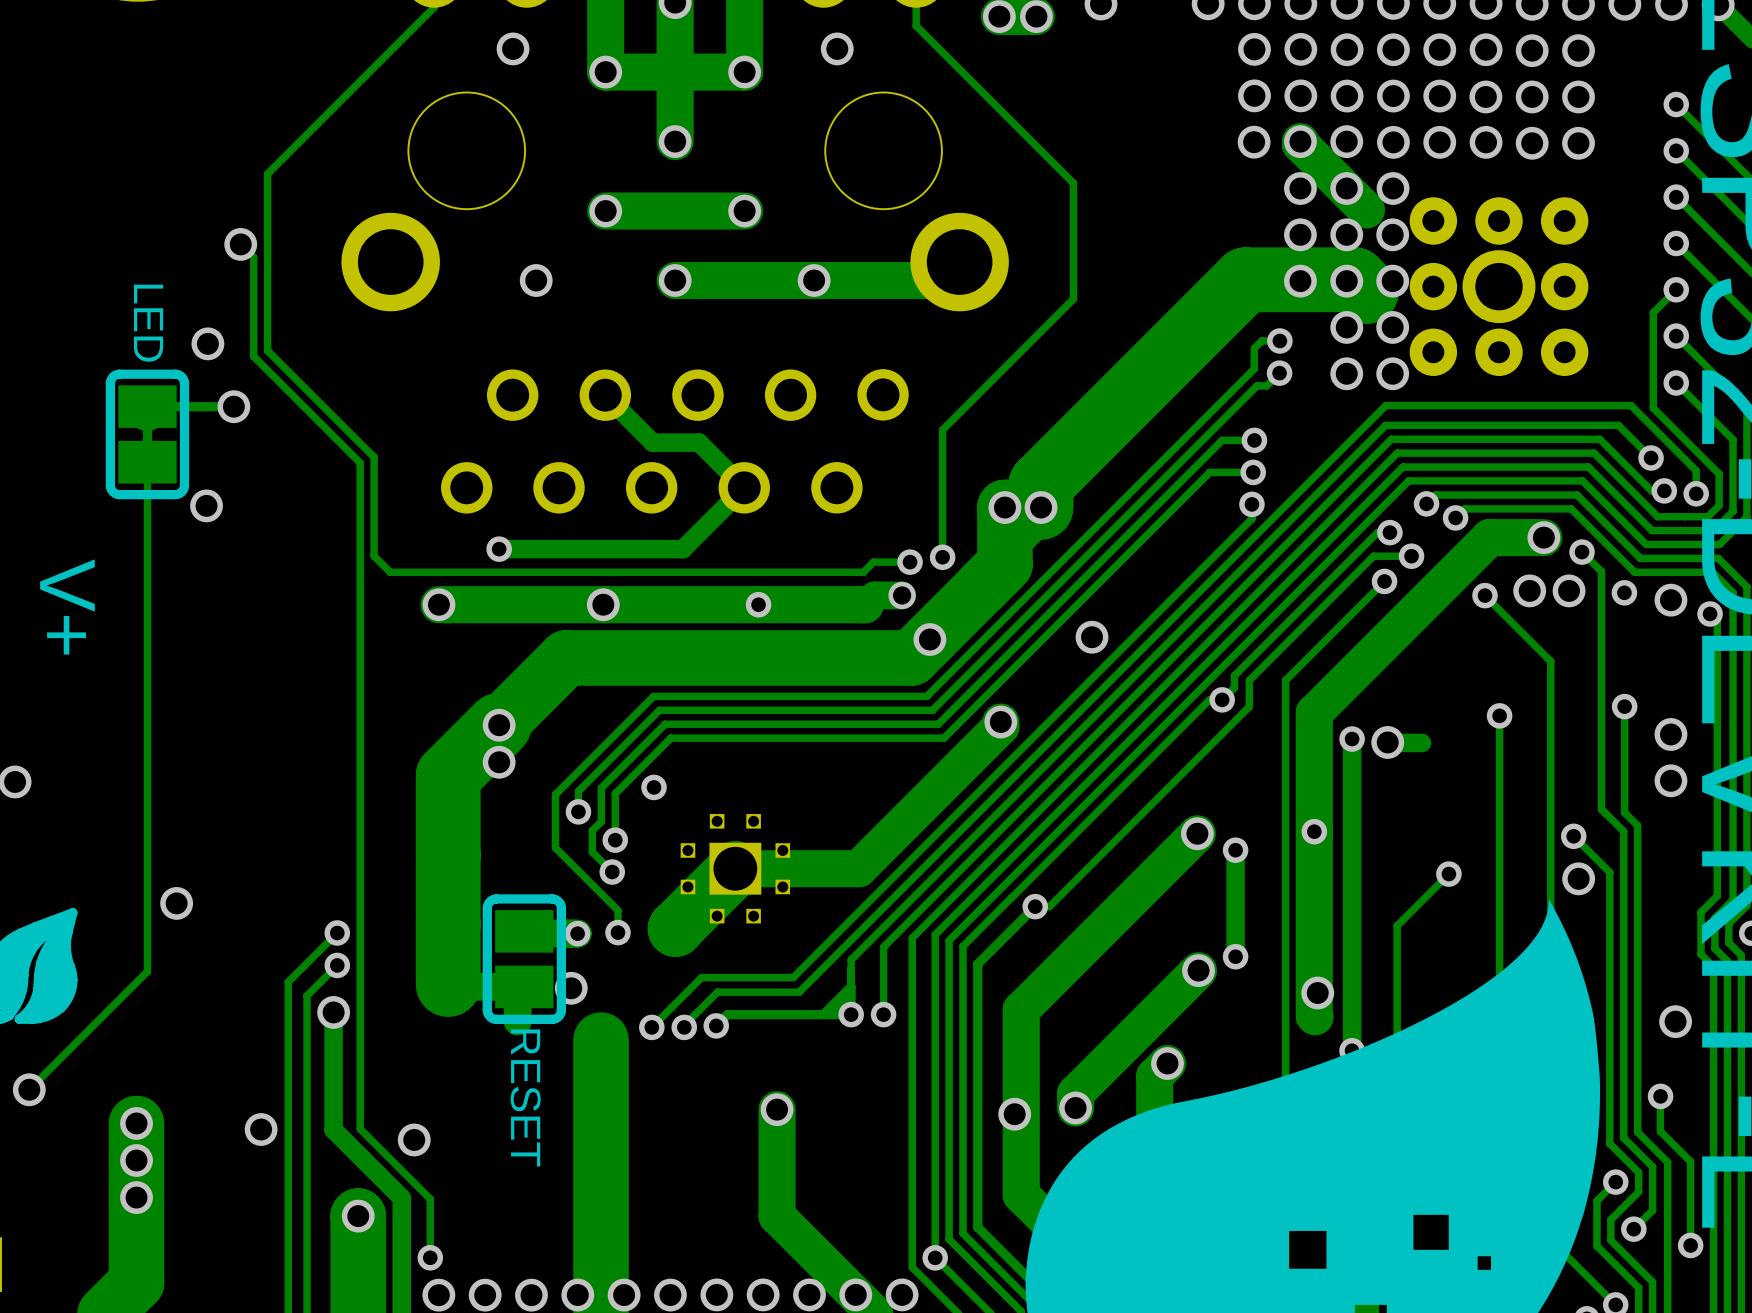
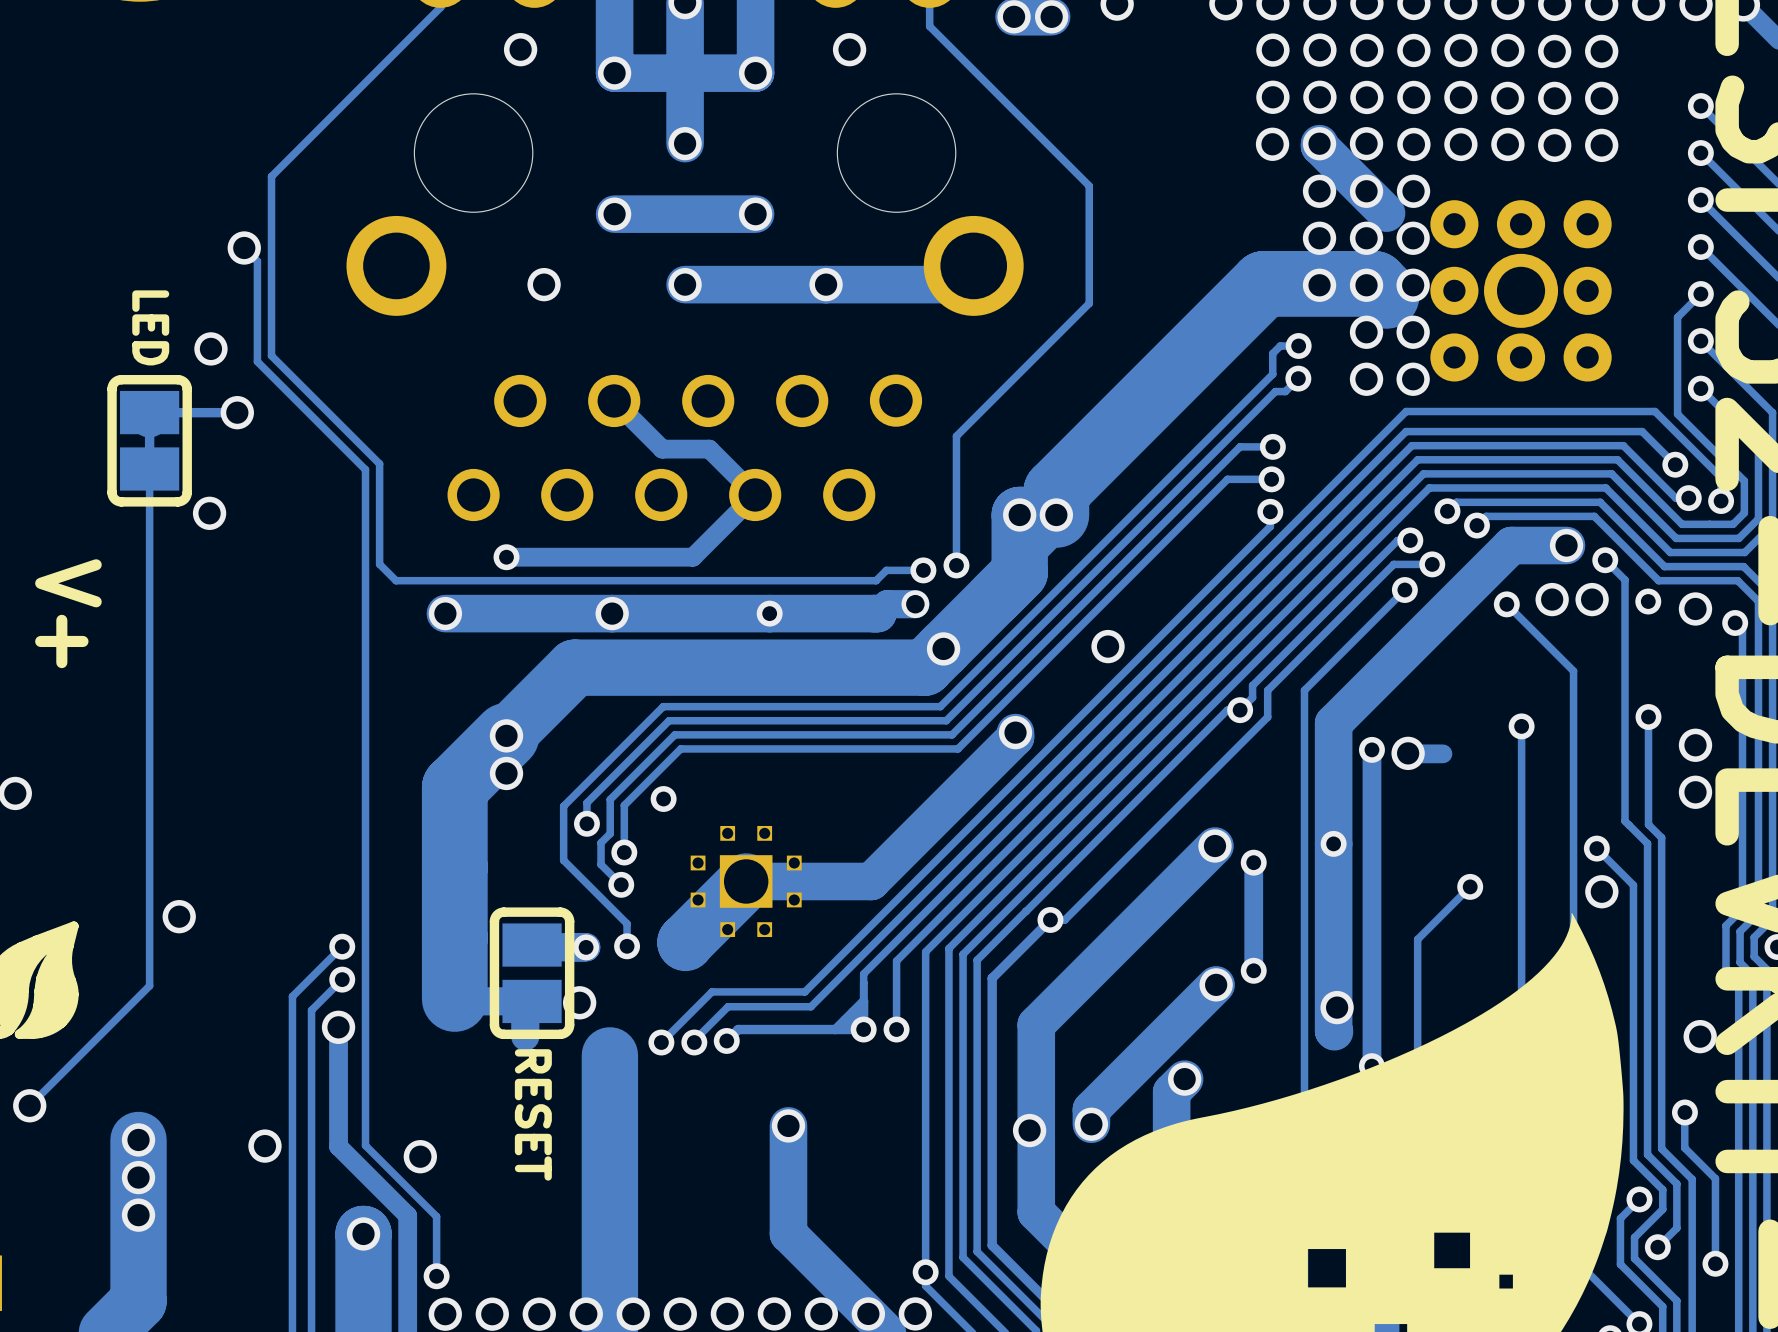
via position: (935, 1257) -> (925, 1272)

